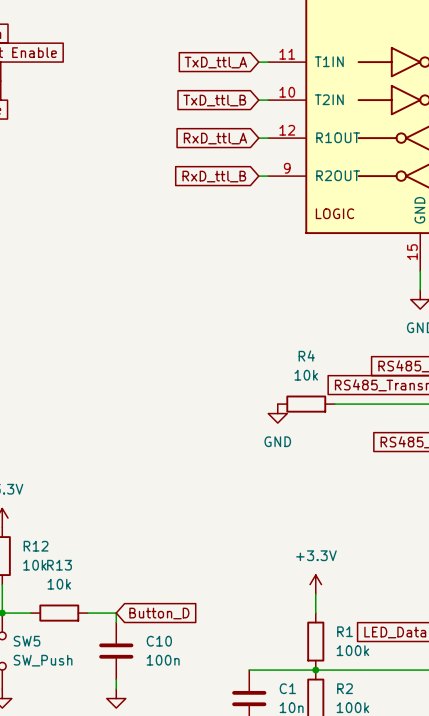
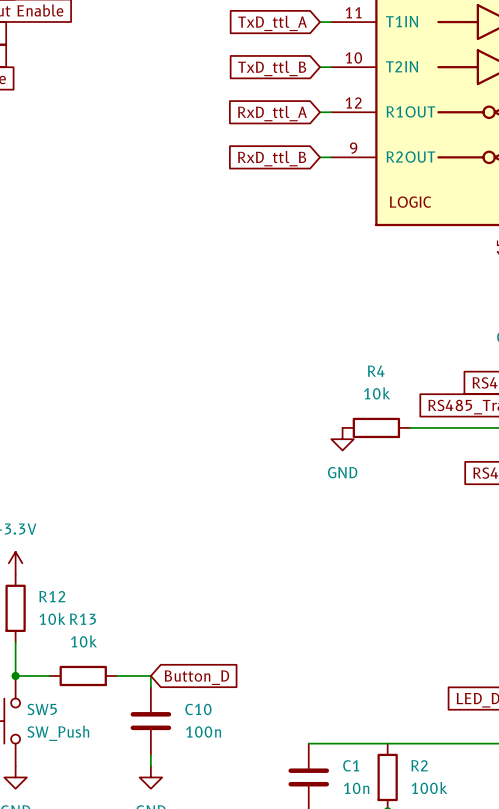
power symbol: +3.3V (315, 584) -> none
wire: (315, 594) (315, 613) -> none
R1: 100k (315, 641) -> none
junction: (315, 670) -> none

